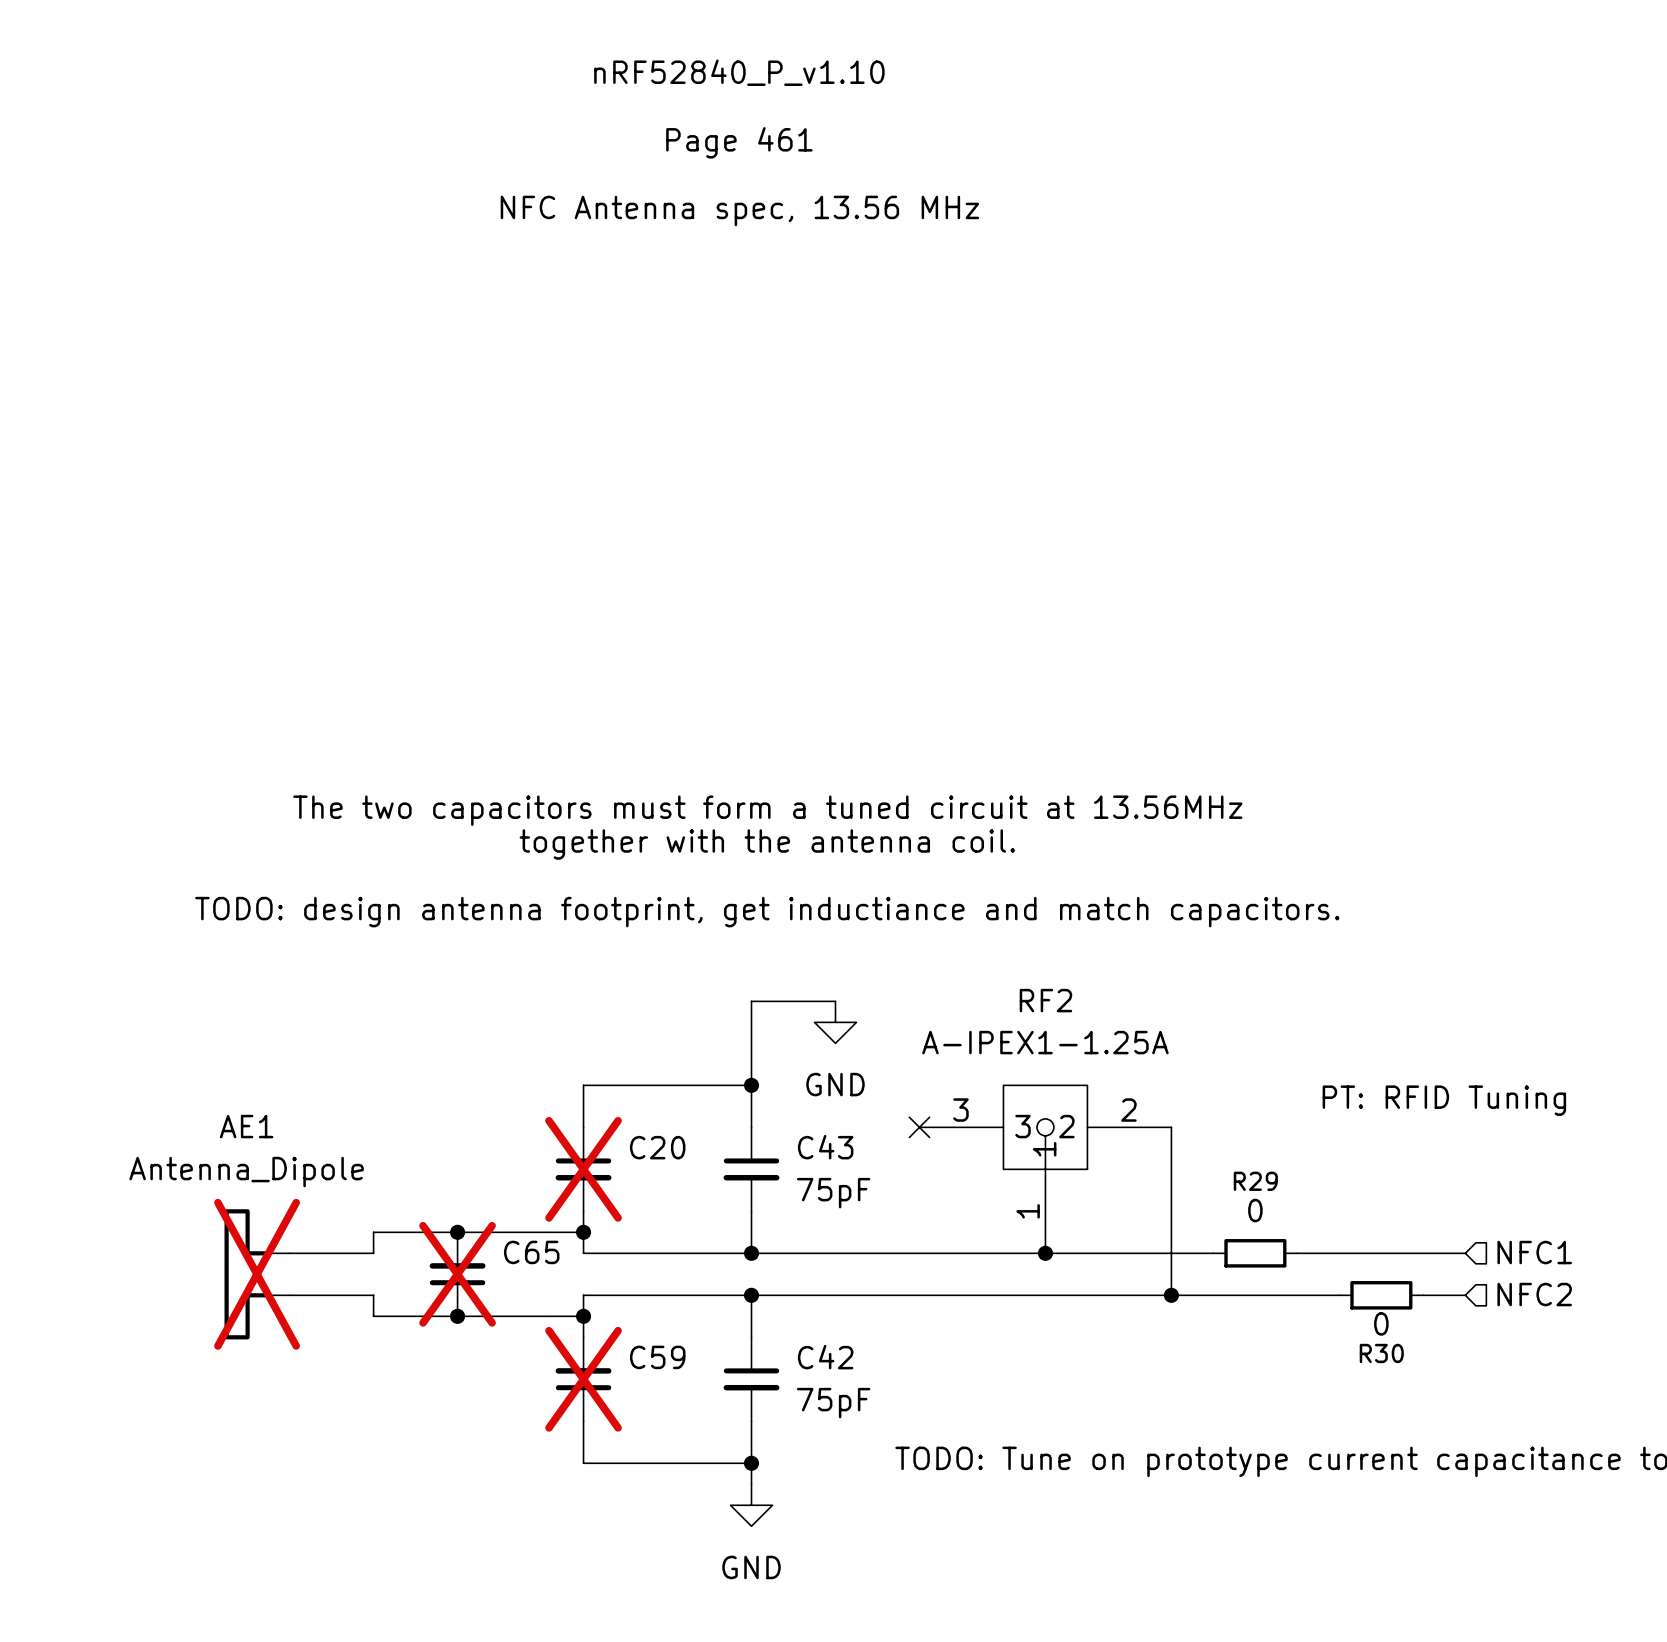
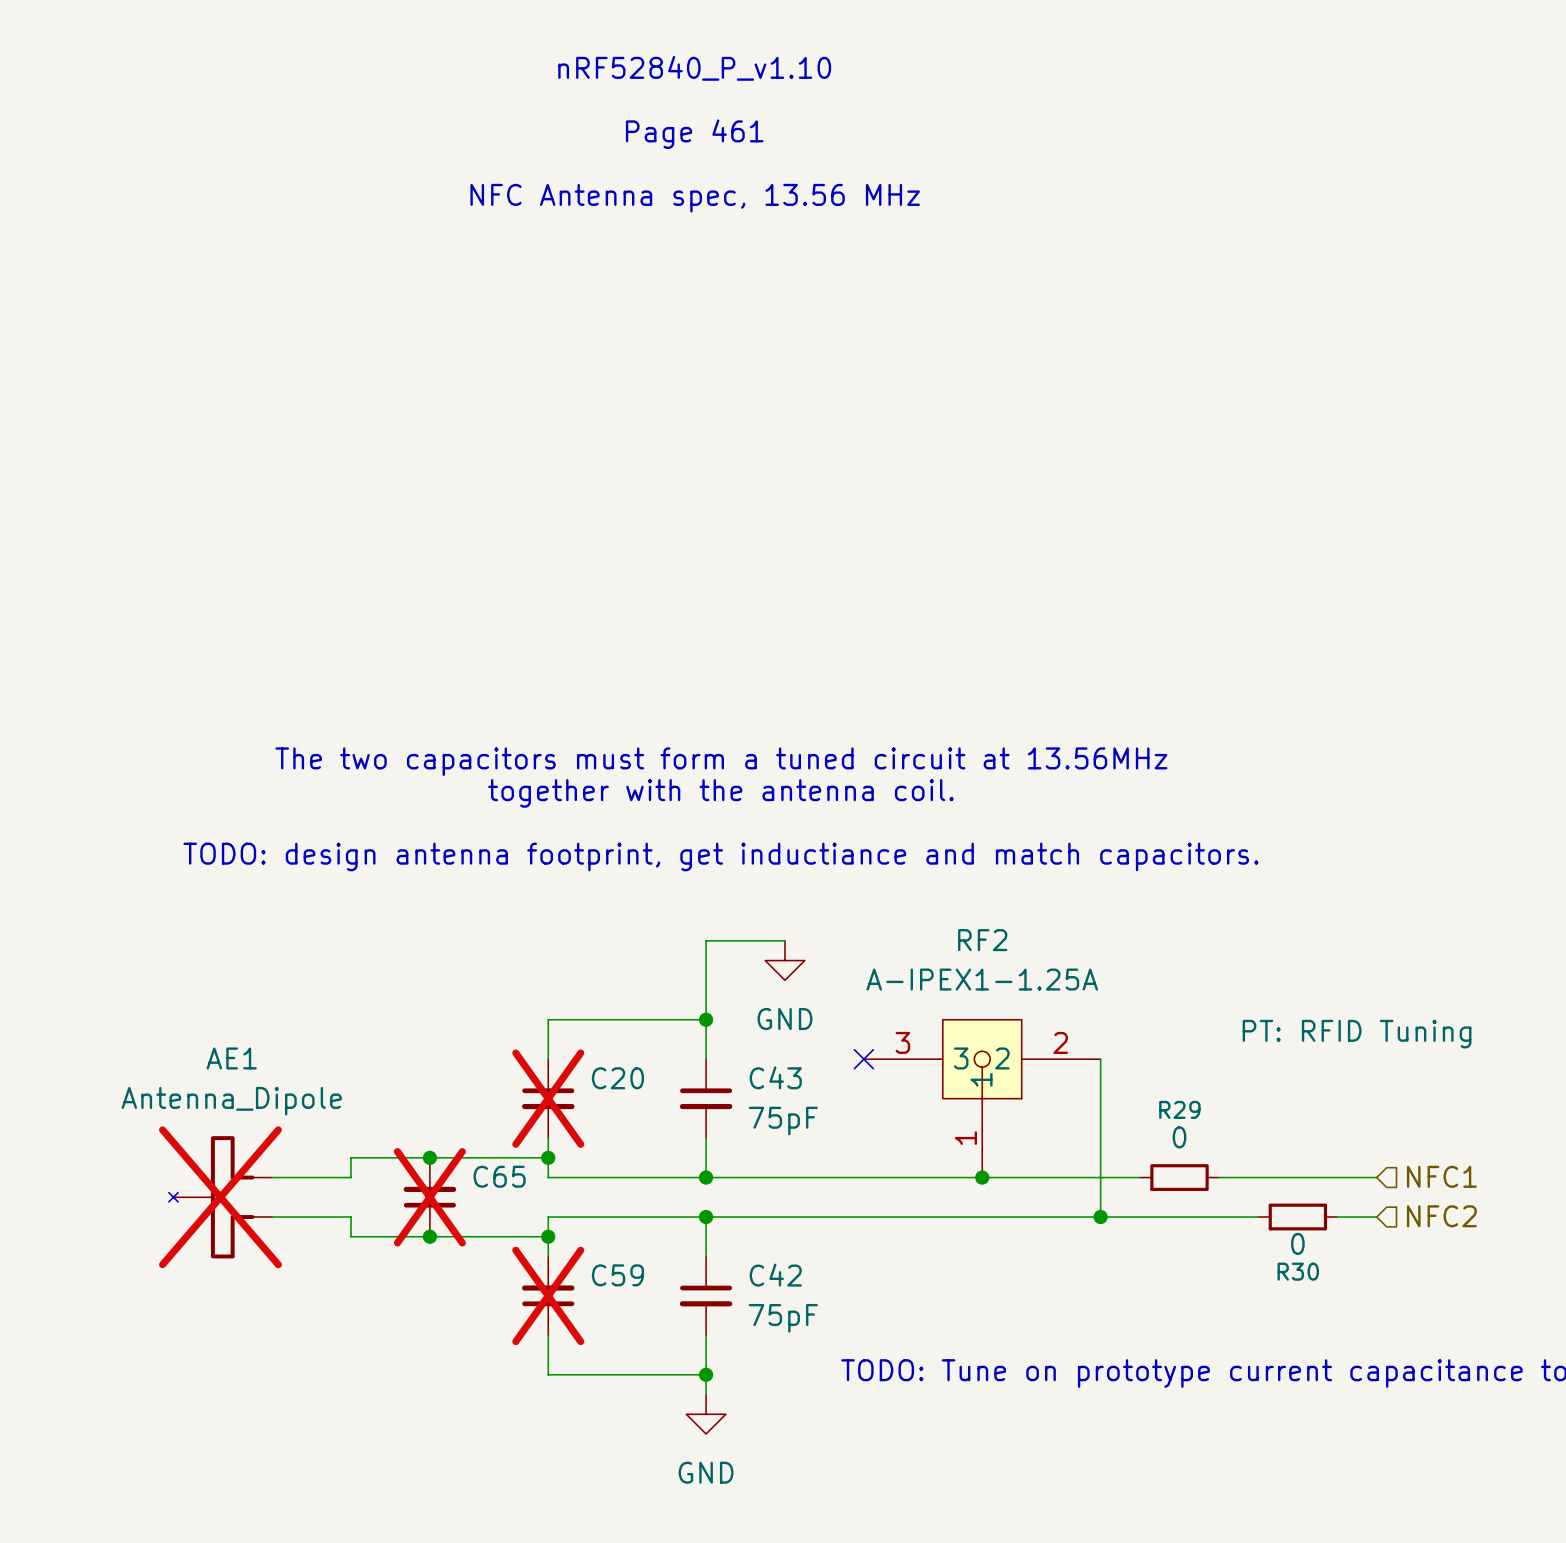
AE1 symbol: [224, 1209, 290, 1340] -> [168, 1136, 273, 1259]

